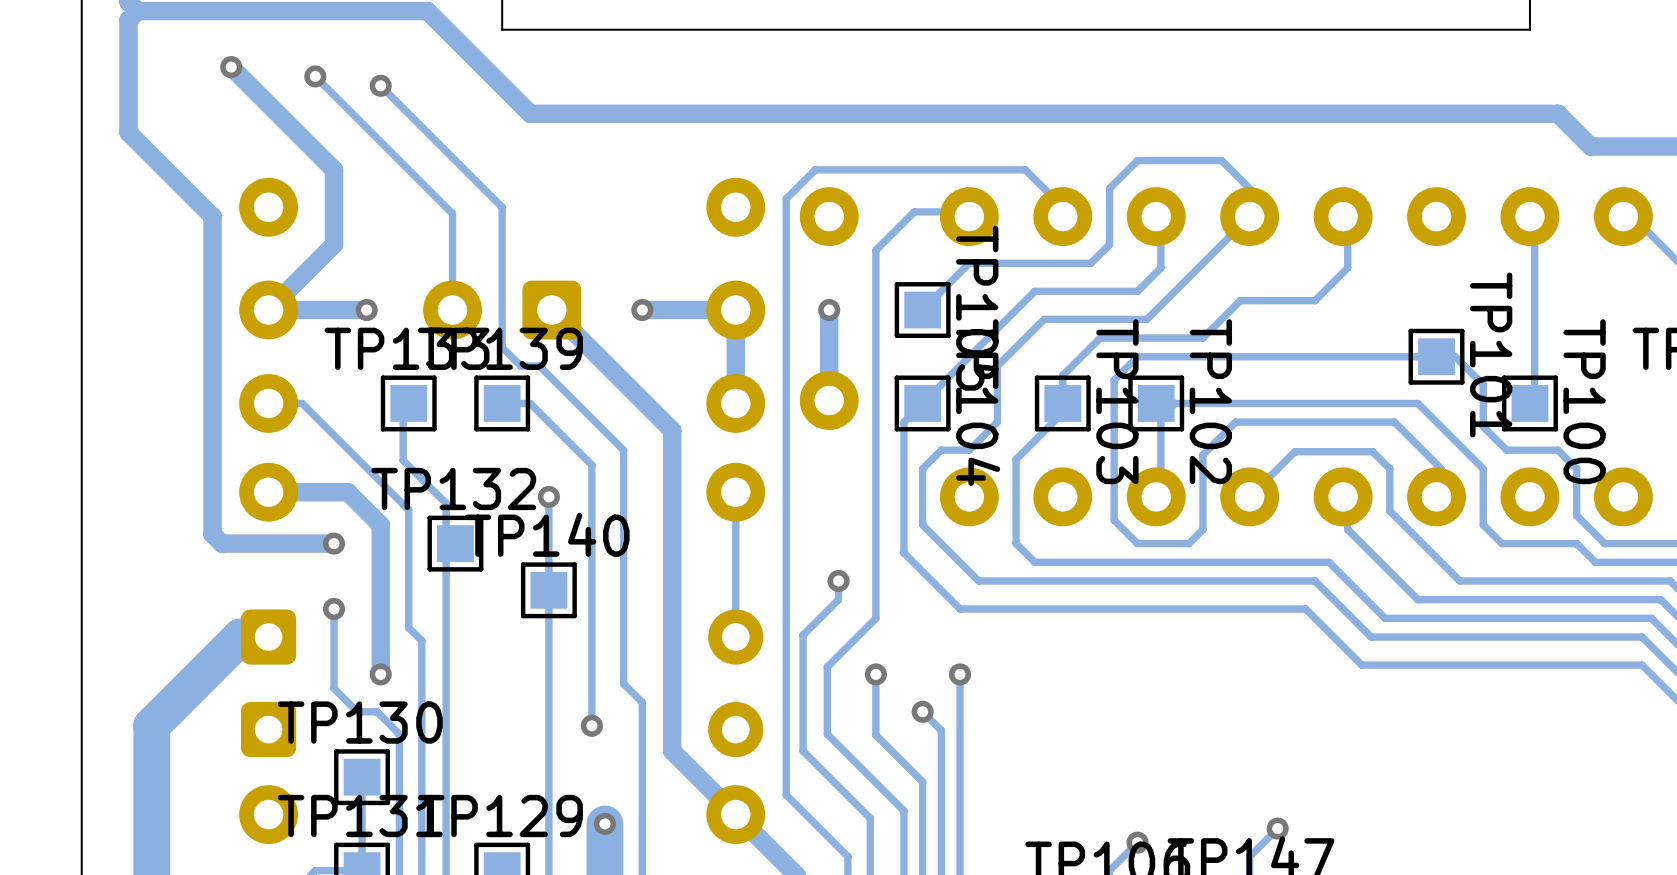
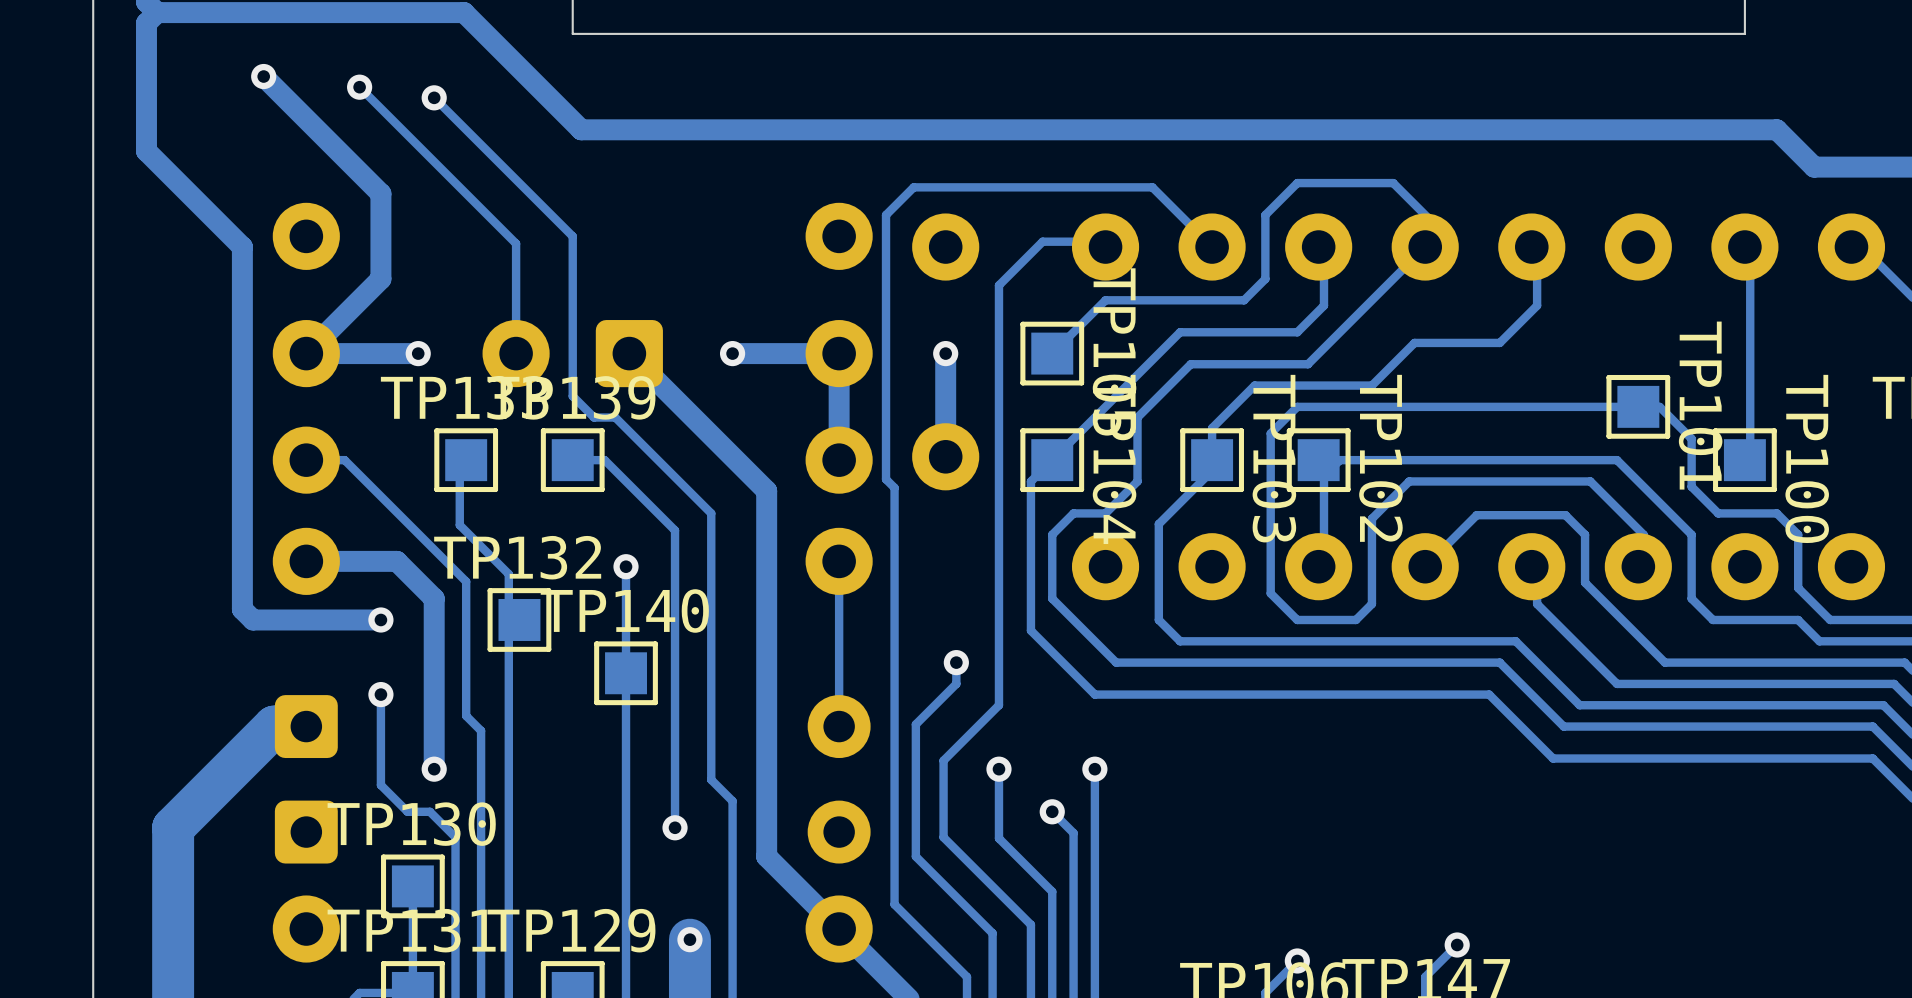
track: (406, 11) (427, 11) (530, 113) -> (464, 12) (581, 129) (604, 129)
track: (1062, 216) (1062, 207) (1025, 169) (815, 169) (786, 198) (786, 794) -> (1212, 247) (1152, 187) (913, 187) (886, 215) (886, 479) (894, 487) (894, 904) (896, 906)

